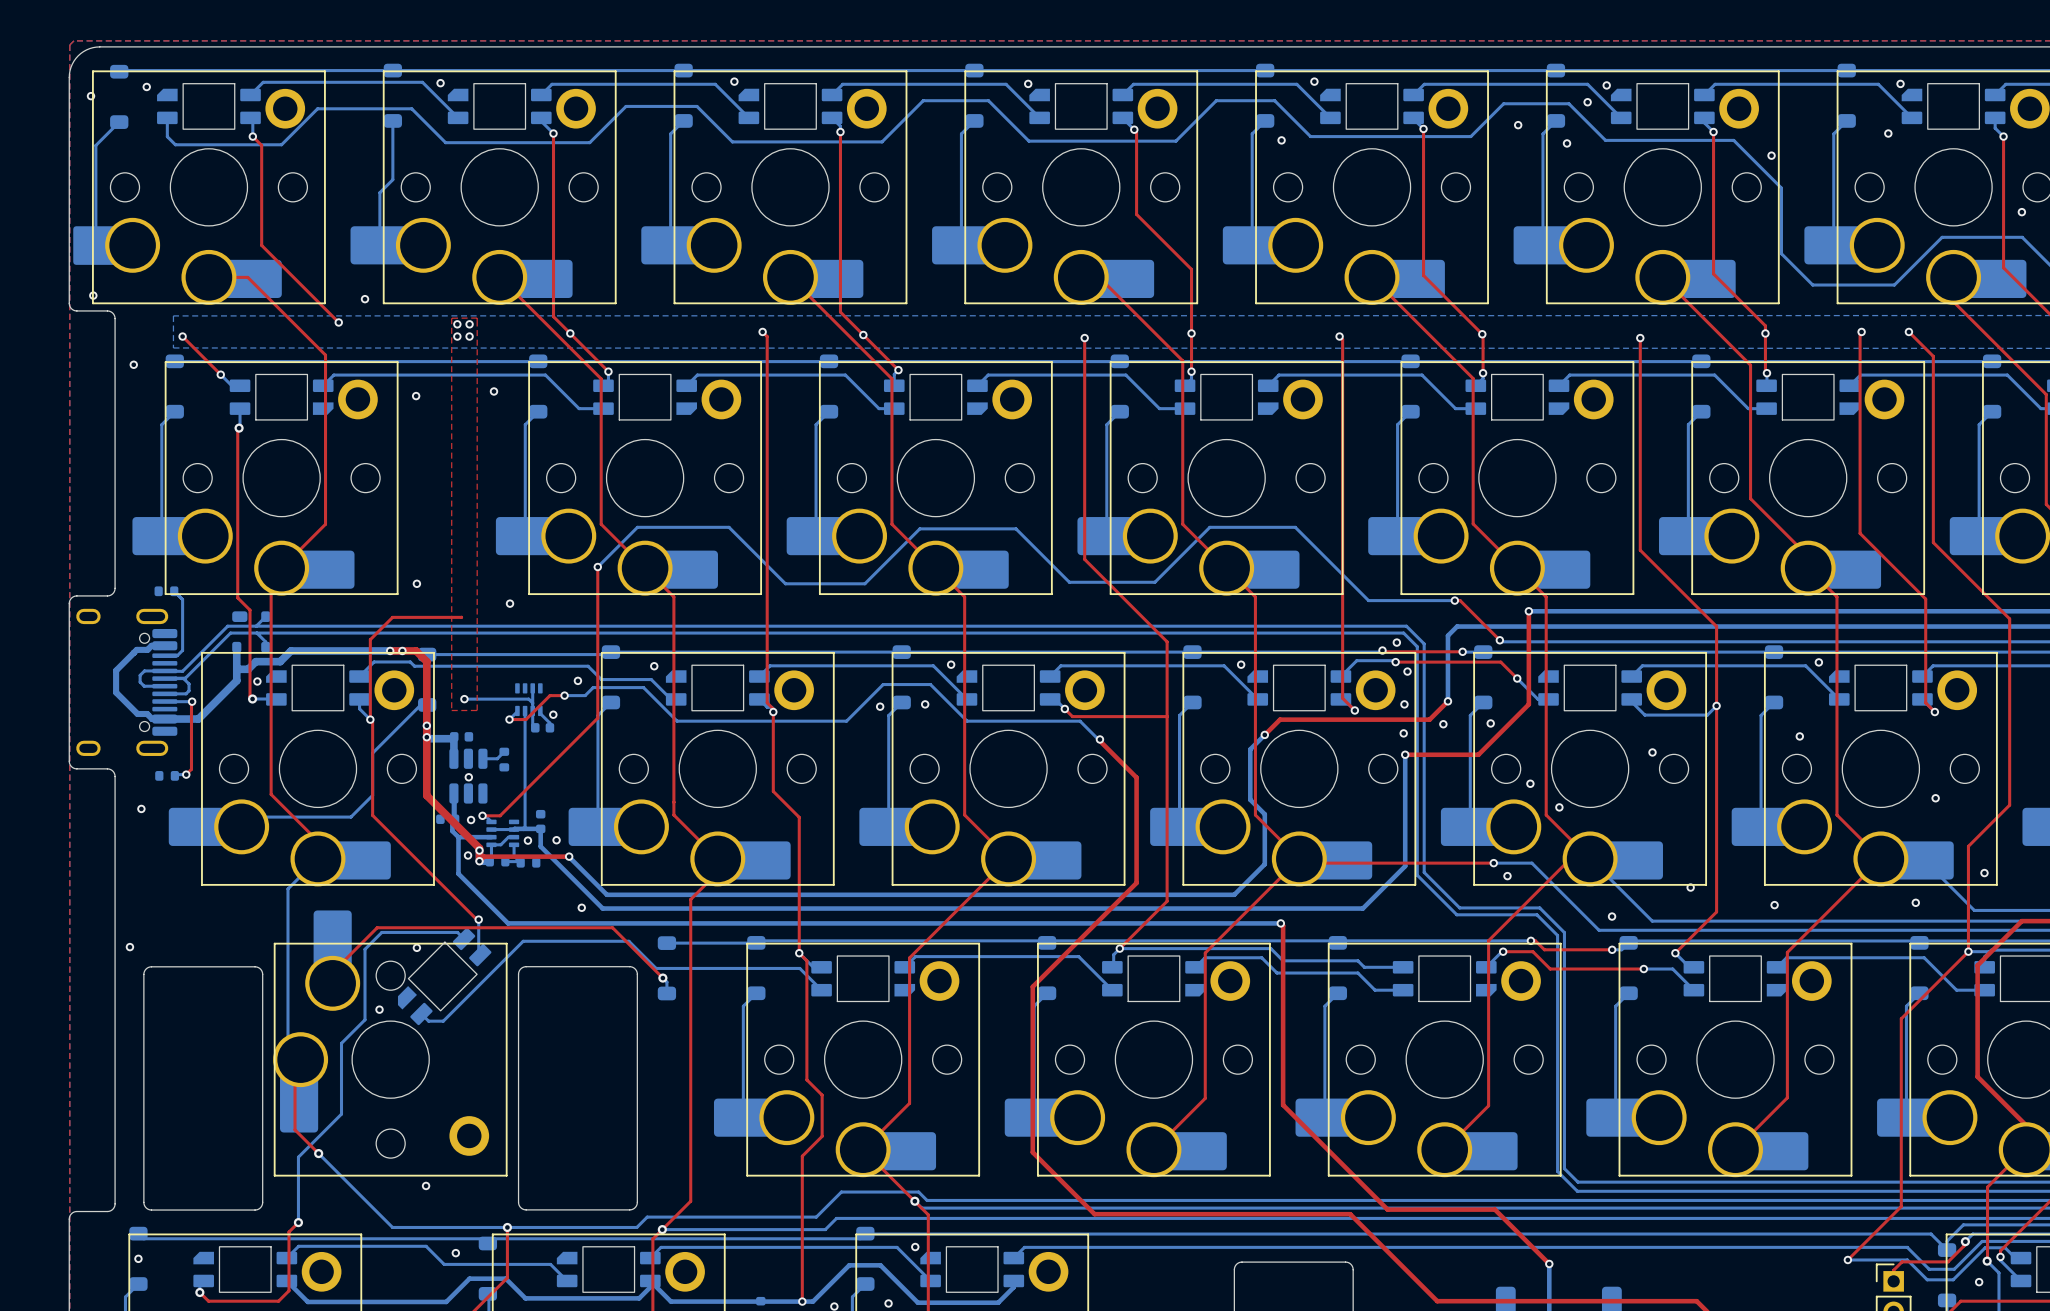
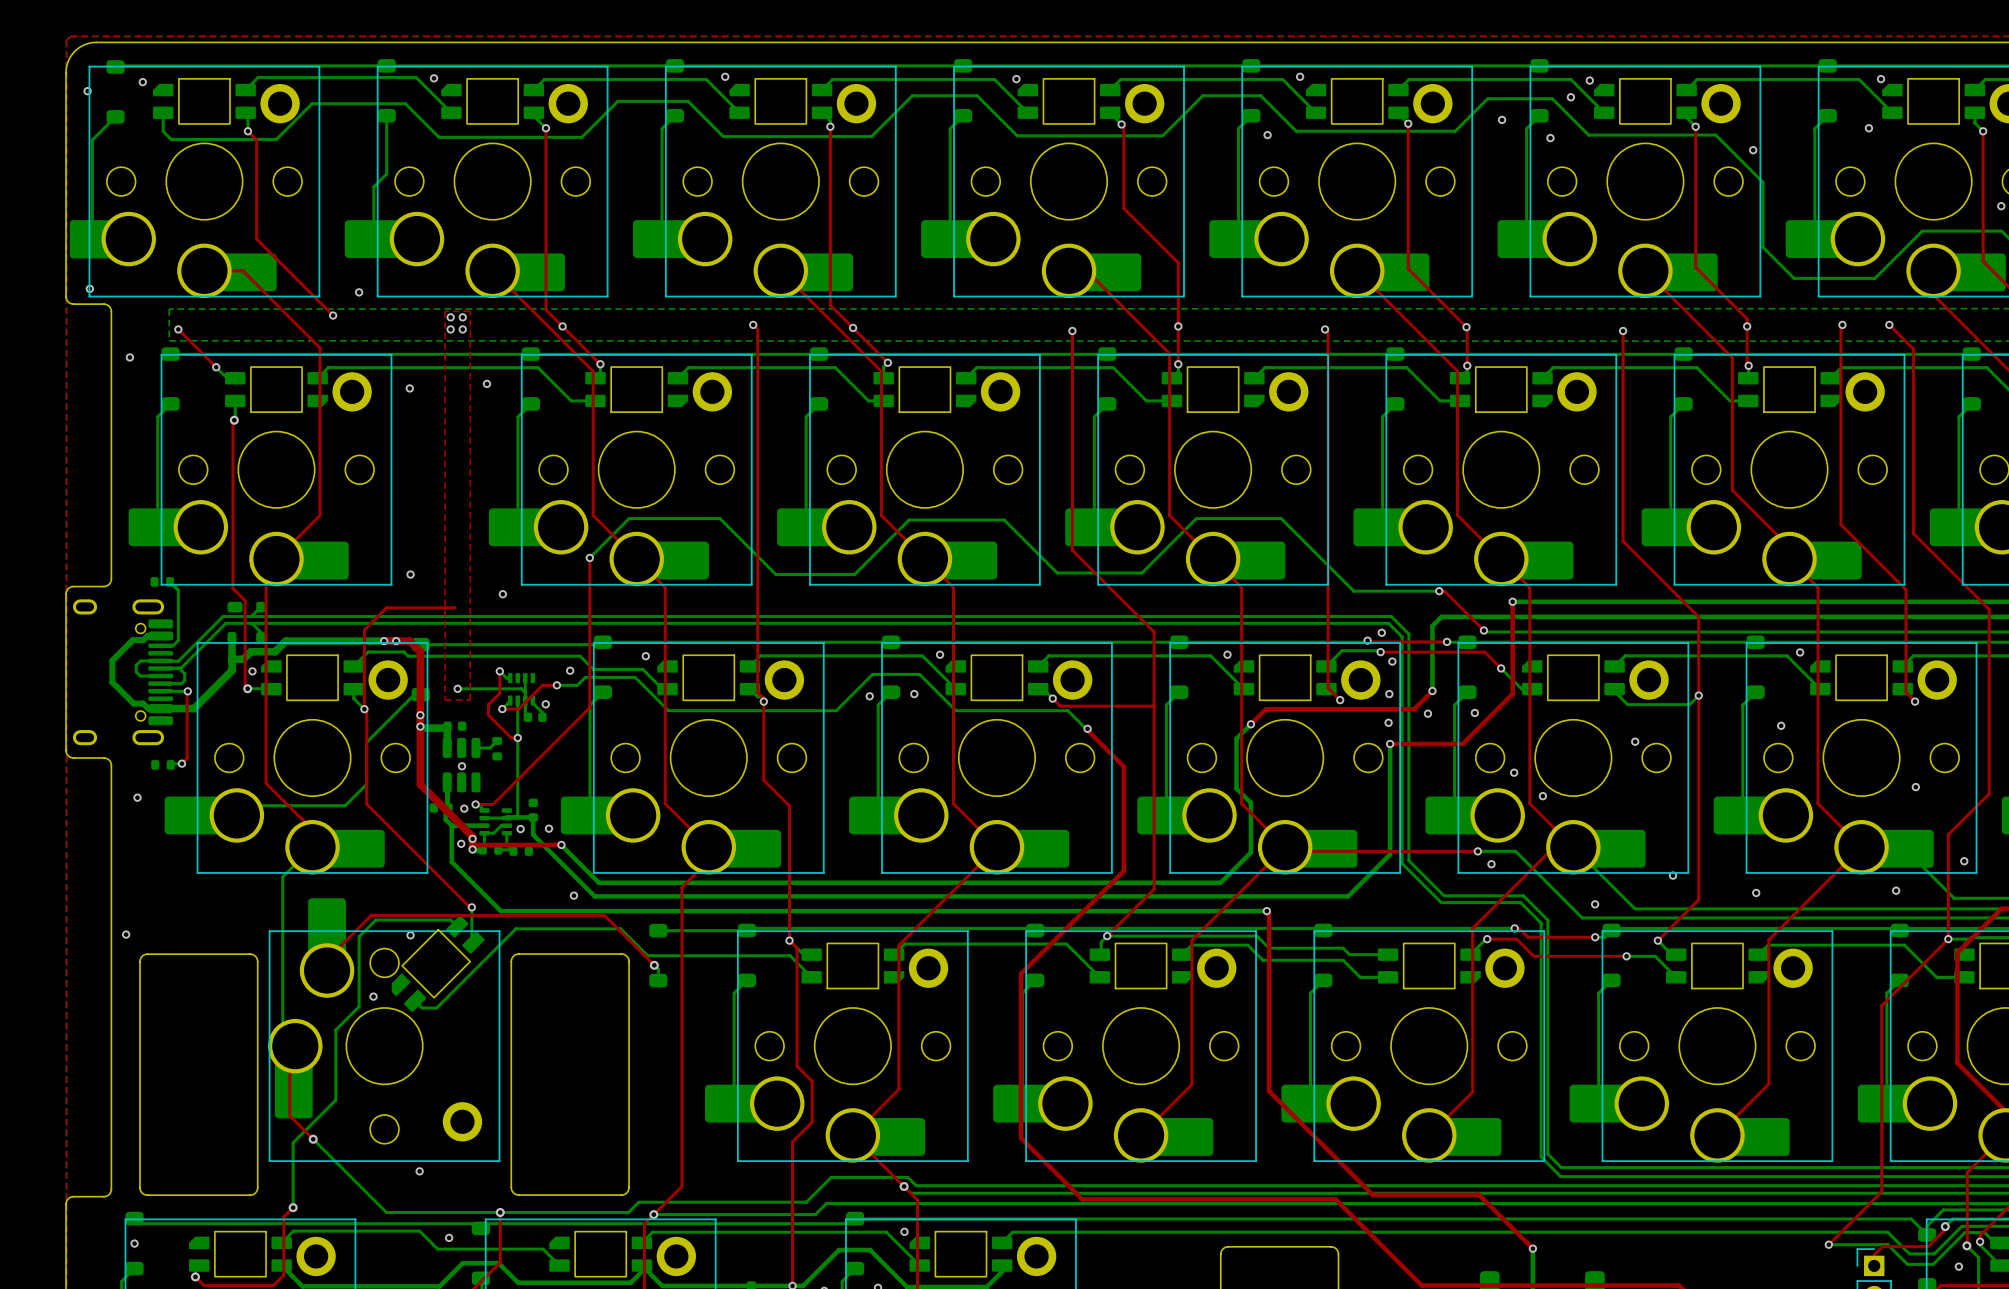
bottom track: none -> (499, 671) (506, 678) (510, 678)
top track: none -> (499, 671) (499, 693) (488, 704) (488, 715) (511, 737) (517, 737)
via: none -> (499, 671)
via: none -> (517, 737)

